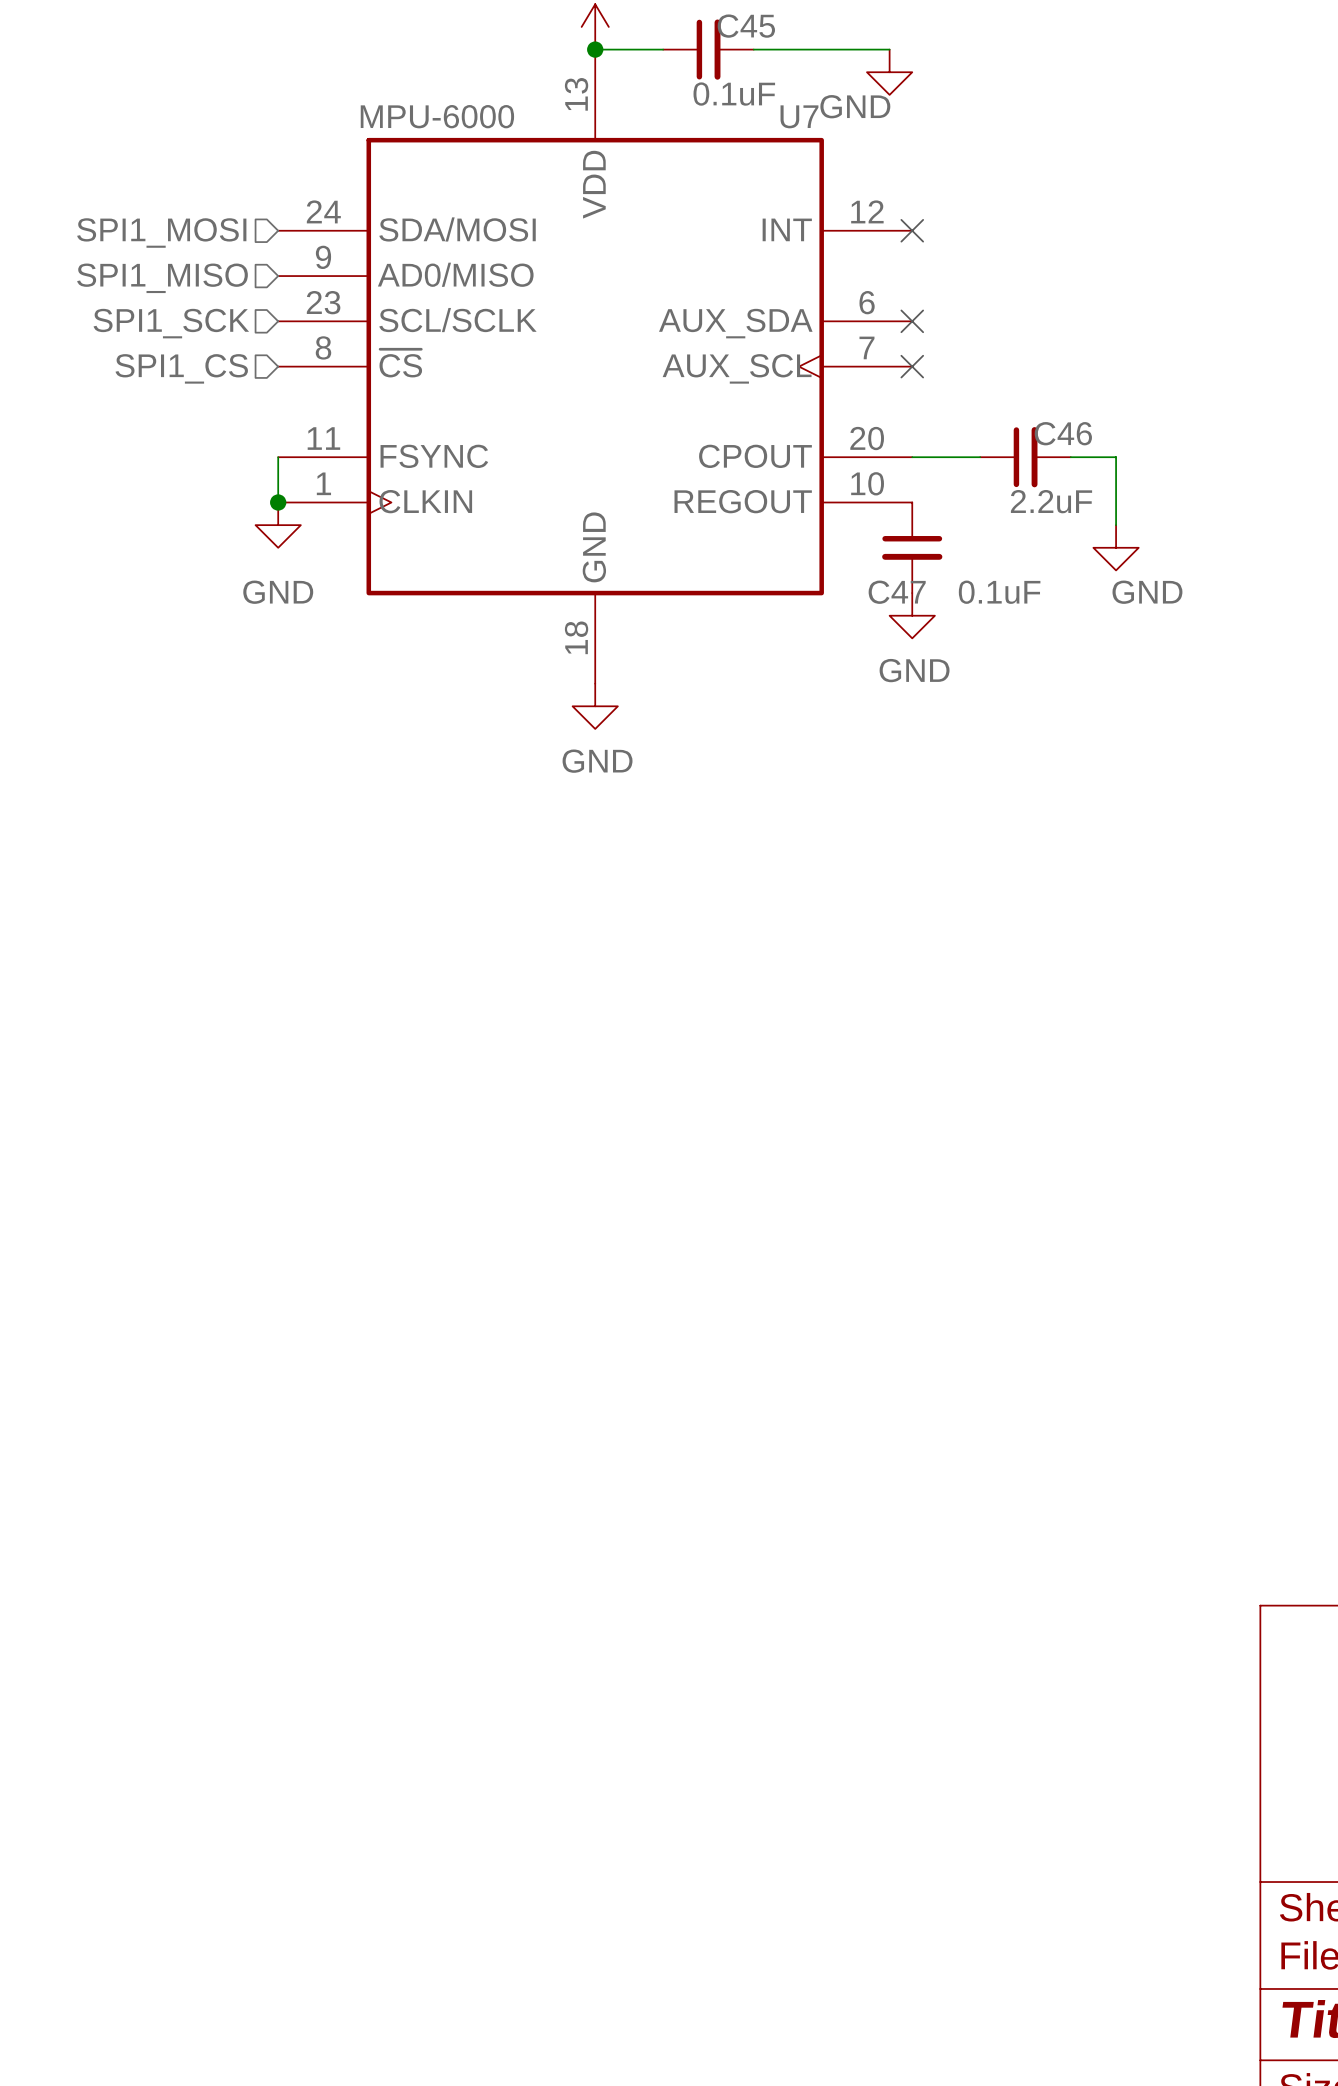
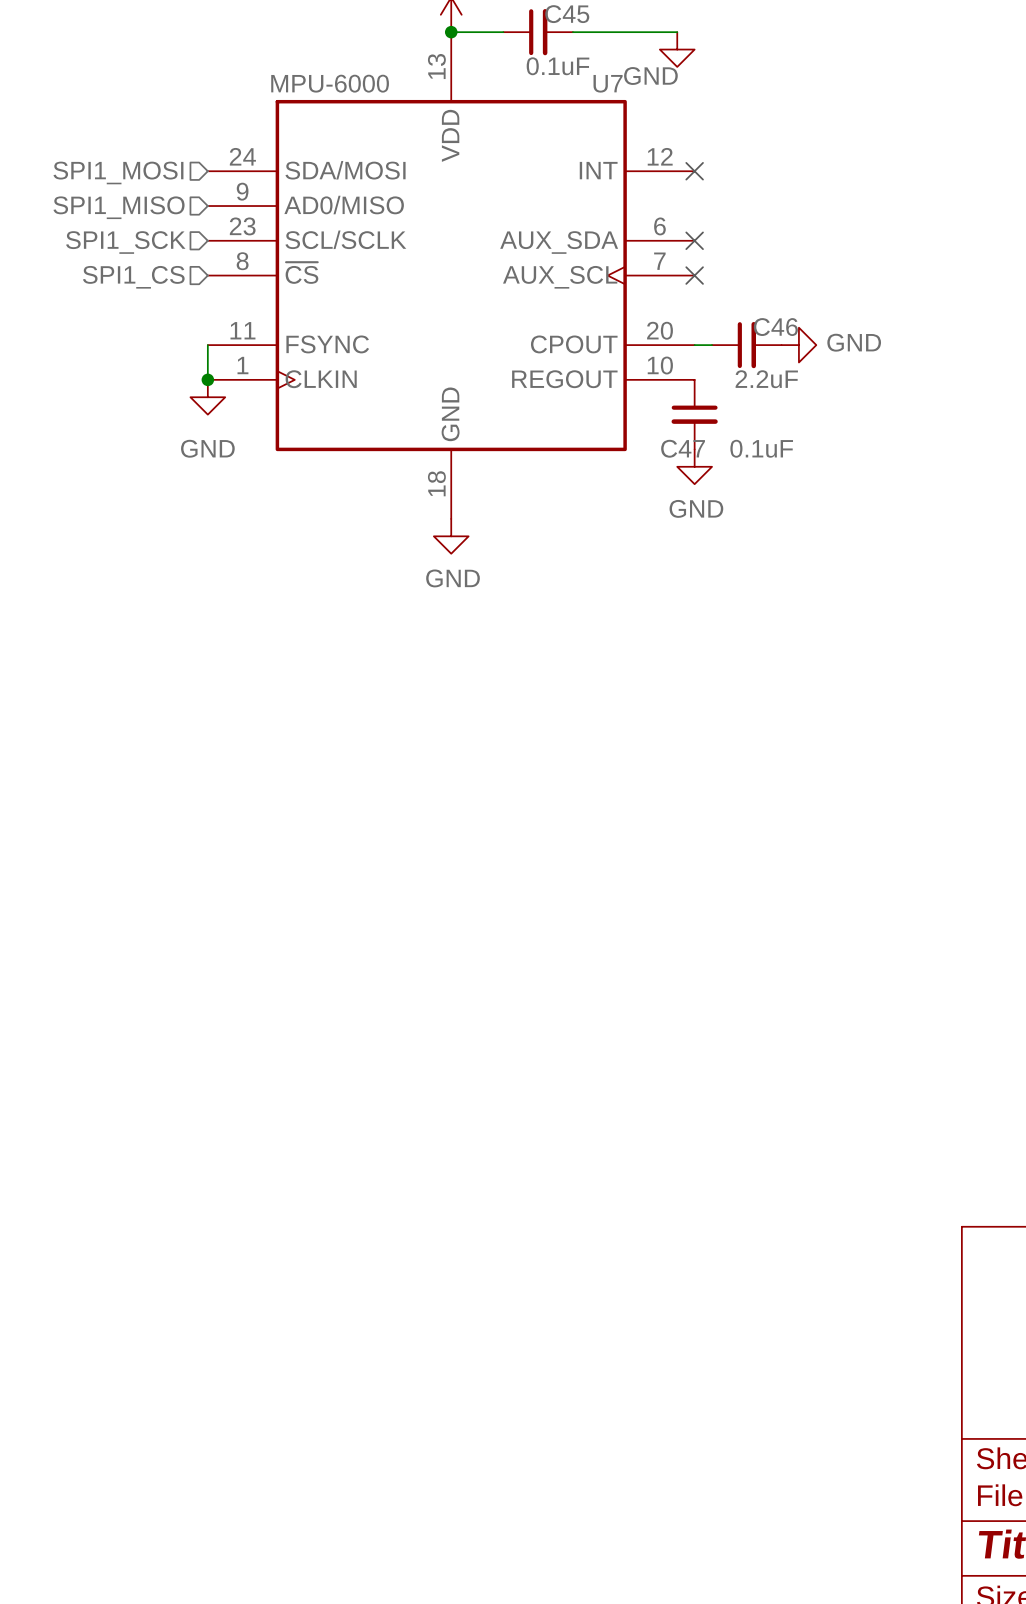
C46 position: (1025, 457) -> (746, 345)
wire: (1070, 457) (1116, 457) (1116, 525) -> none
power symbol rotation: 0° (1116, 547) -> 90° counterclockwise (798, 345)
power symbol position: GND (1116, 547) -> GND (798, 345)
power symbol text position: GND (1147, 592) -> GND (854, 342)

